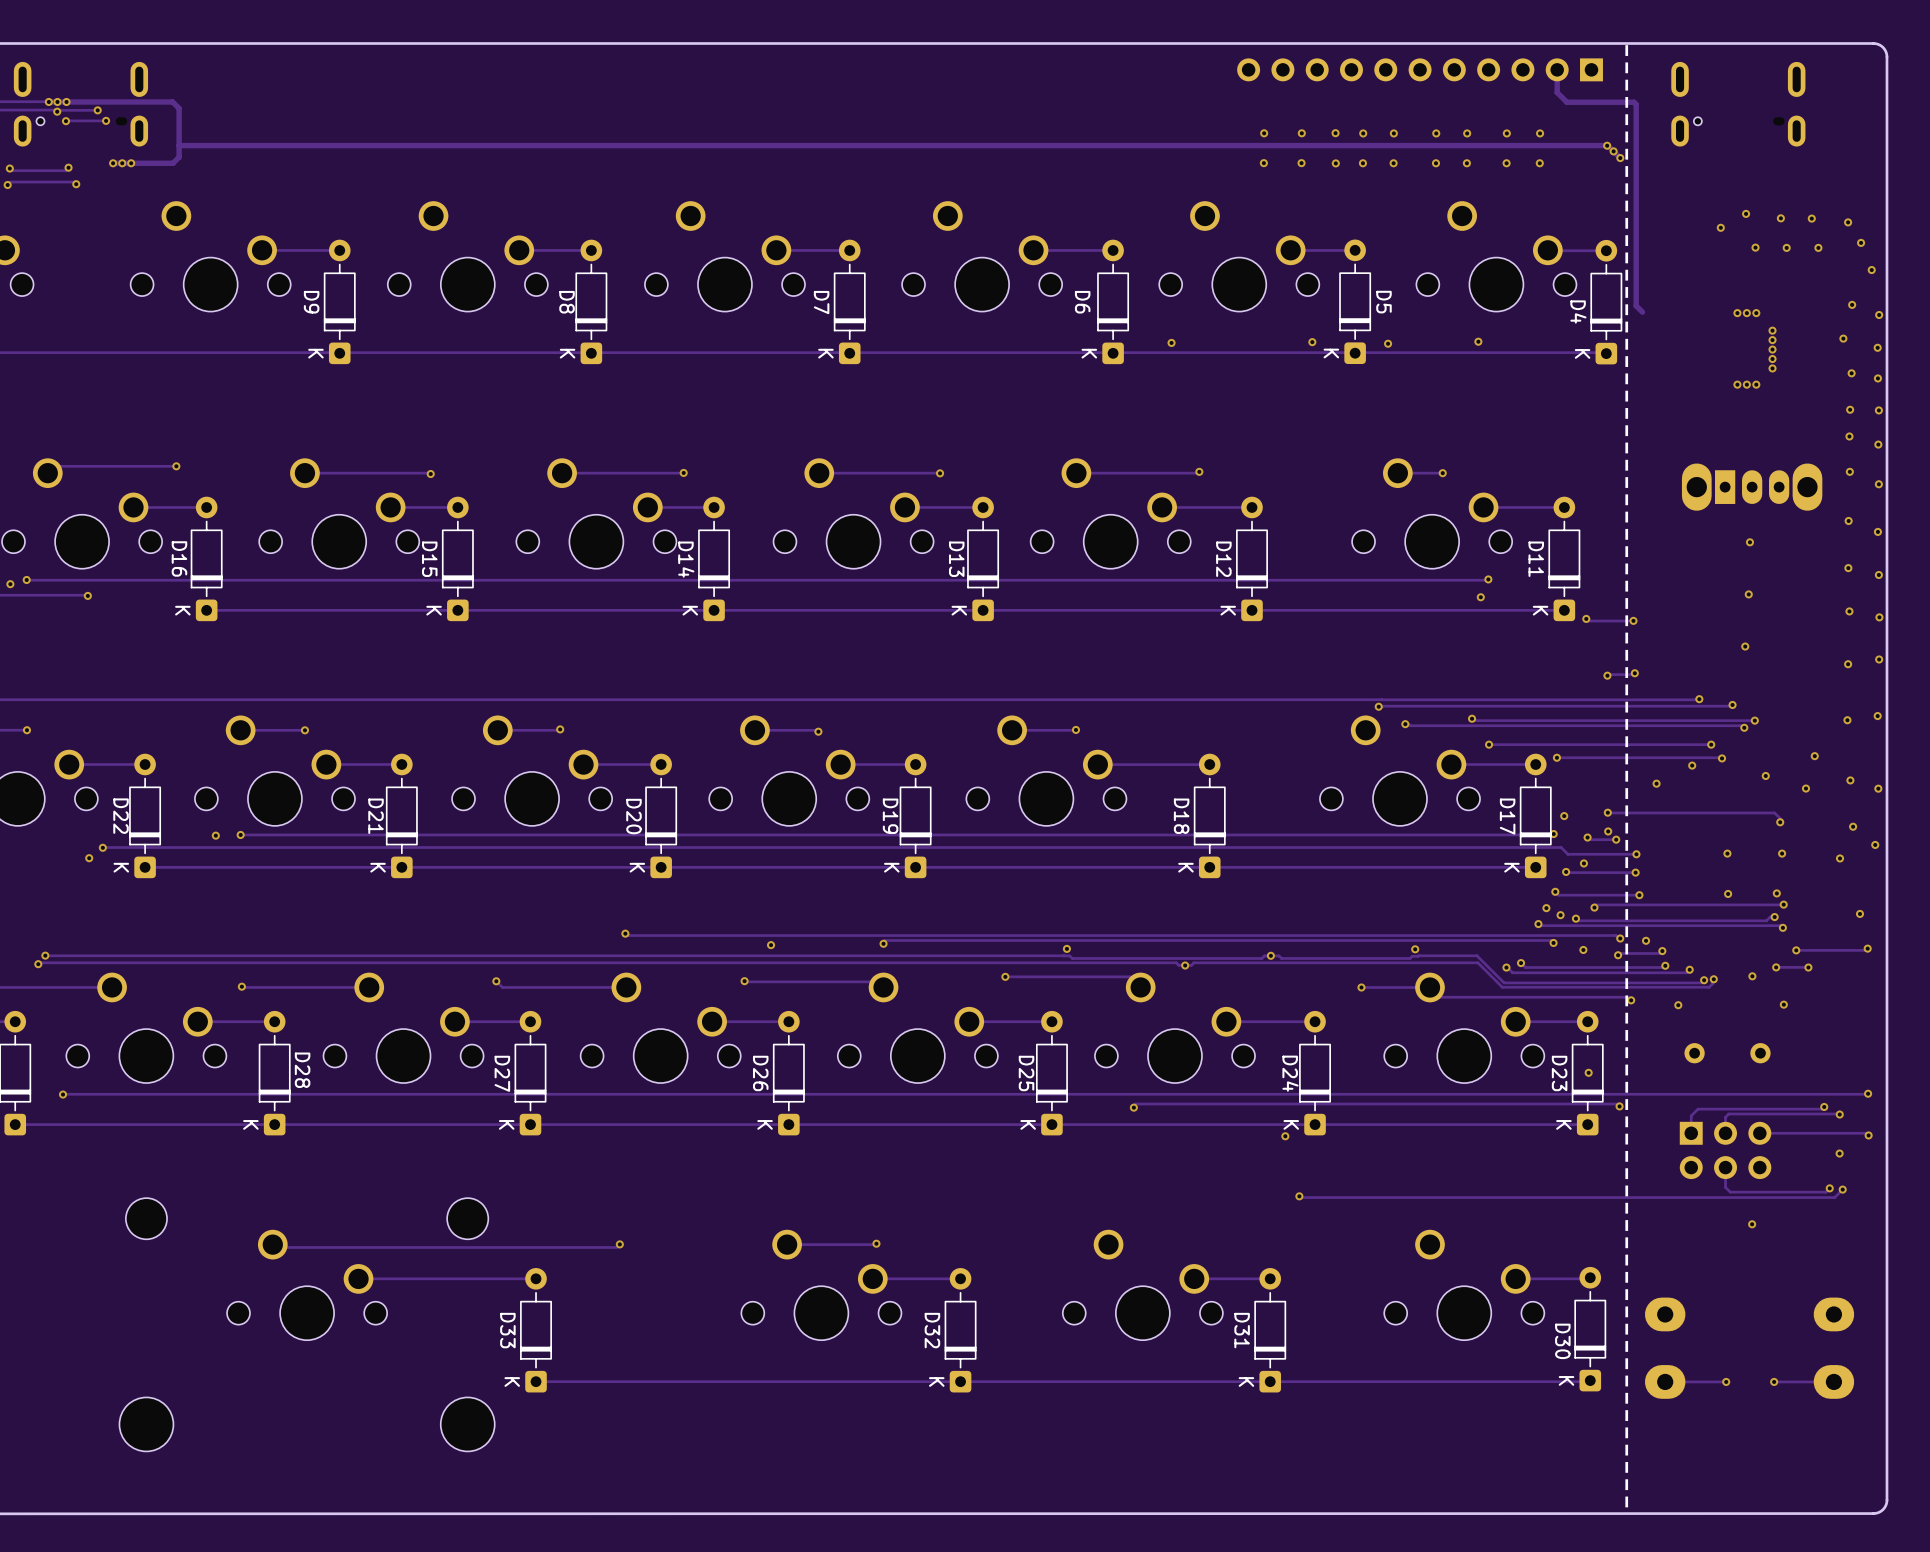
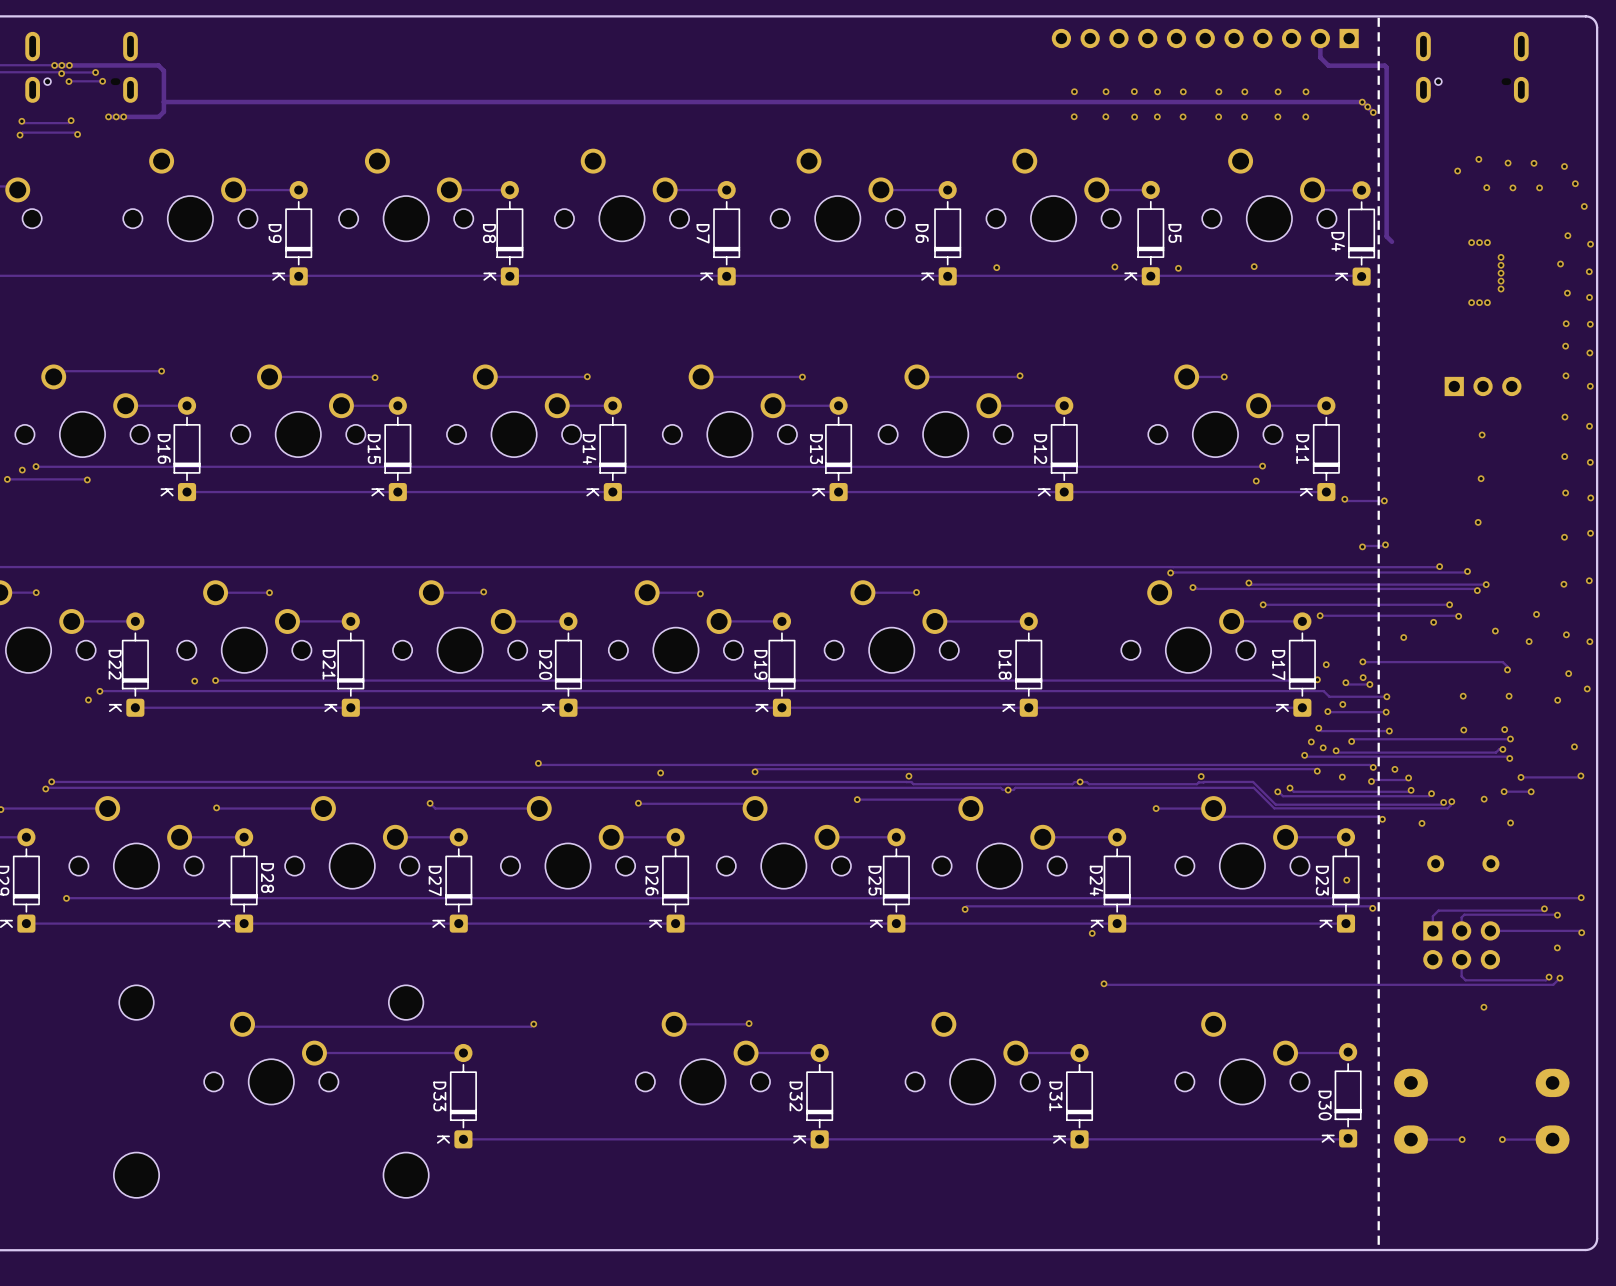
part footprint: [1681, 463, 1823, 511] -> [1444, 376, 1522, 397]

